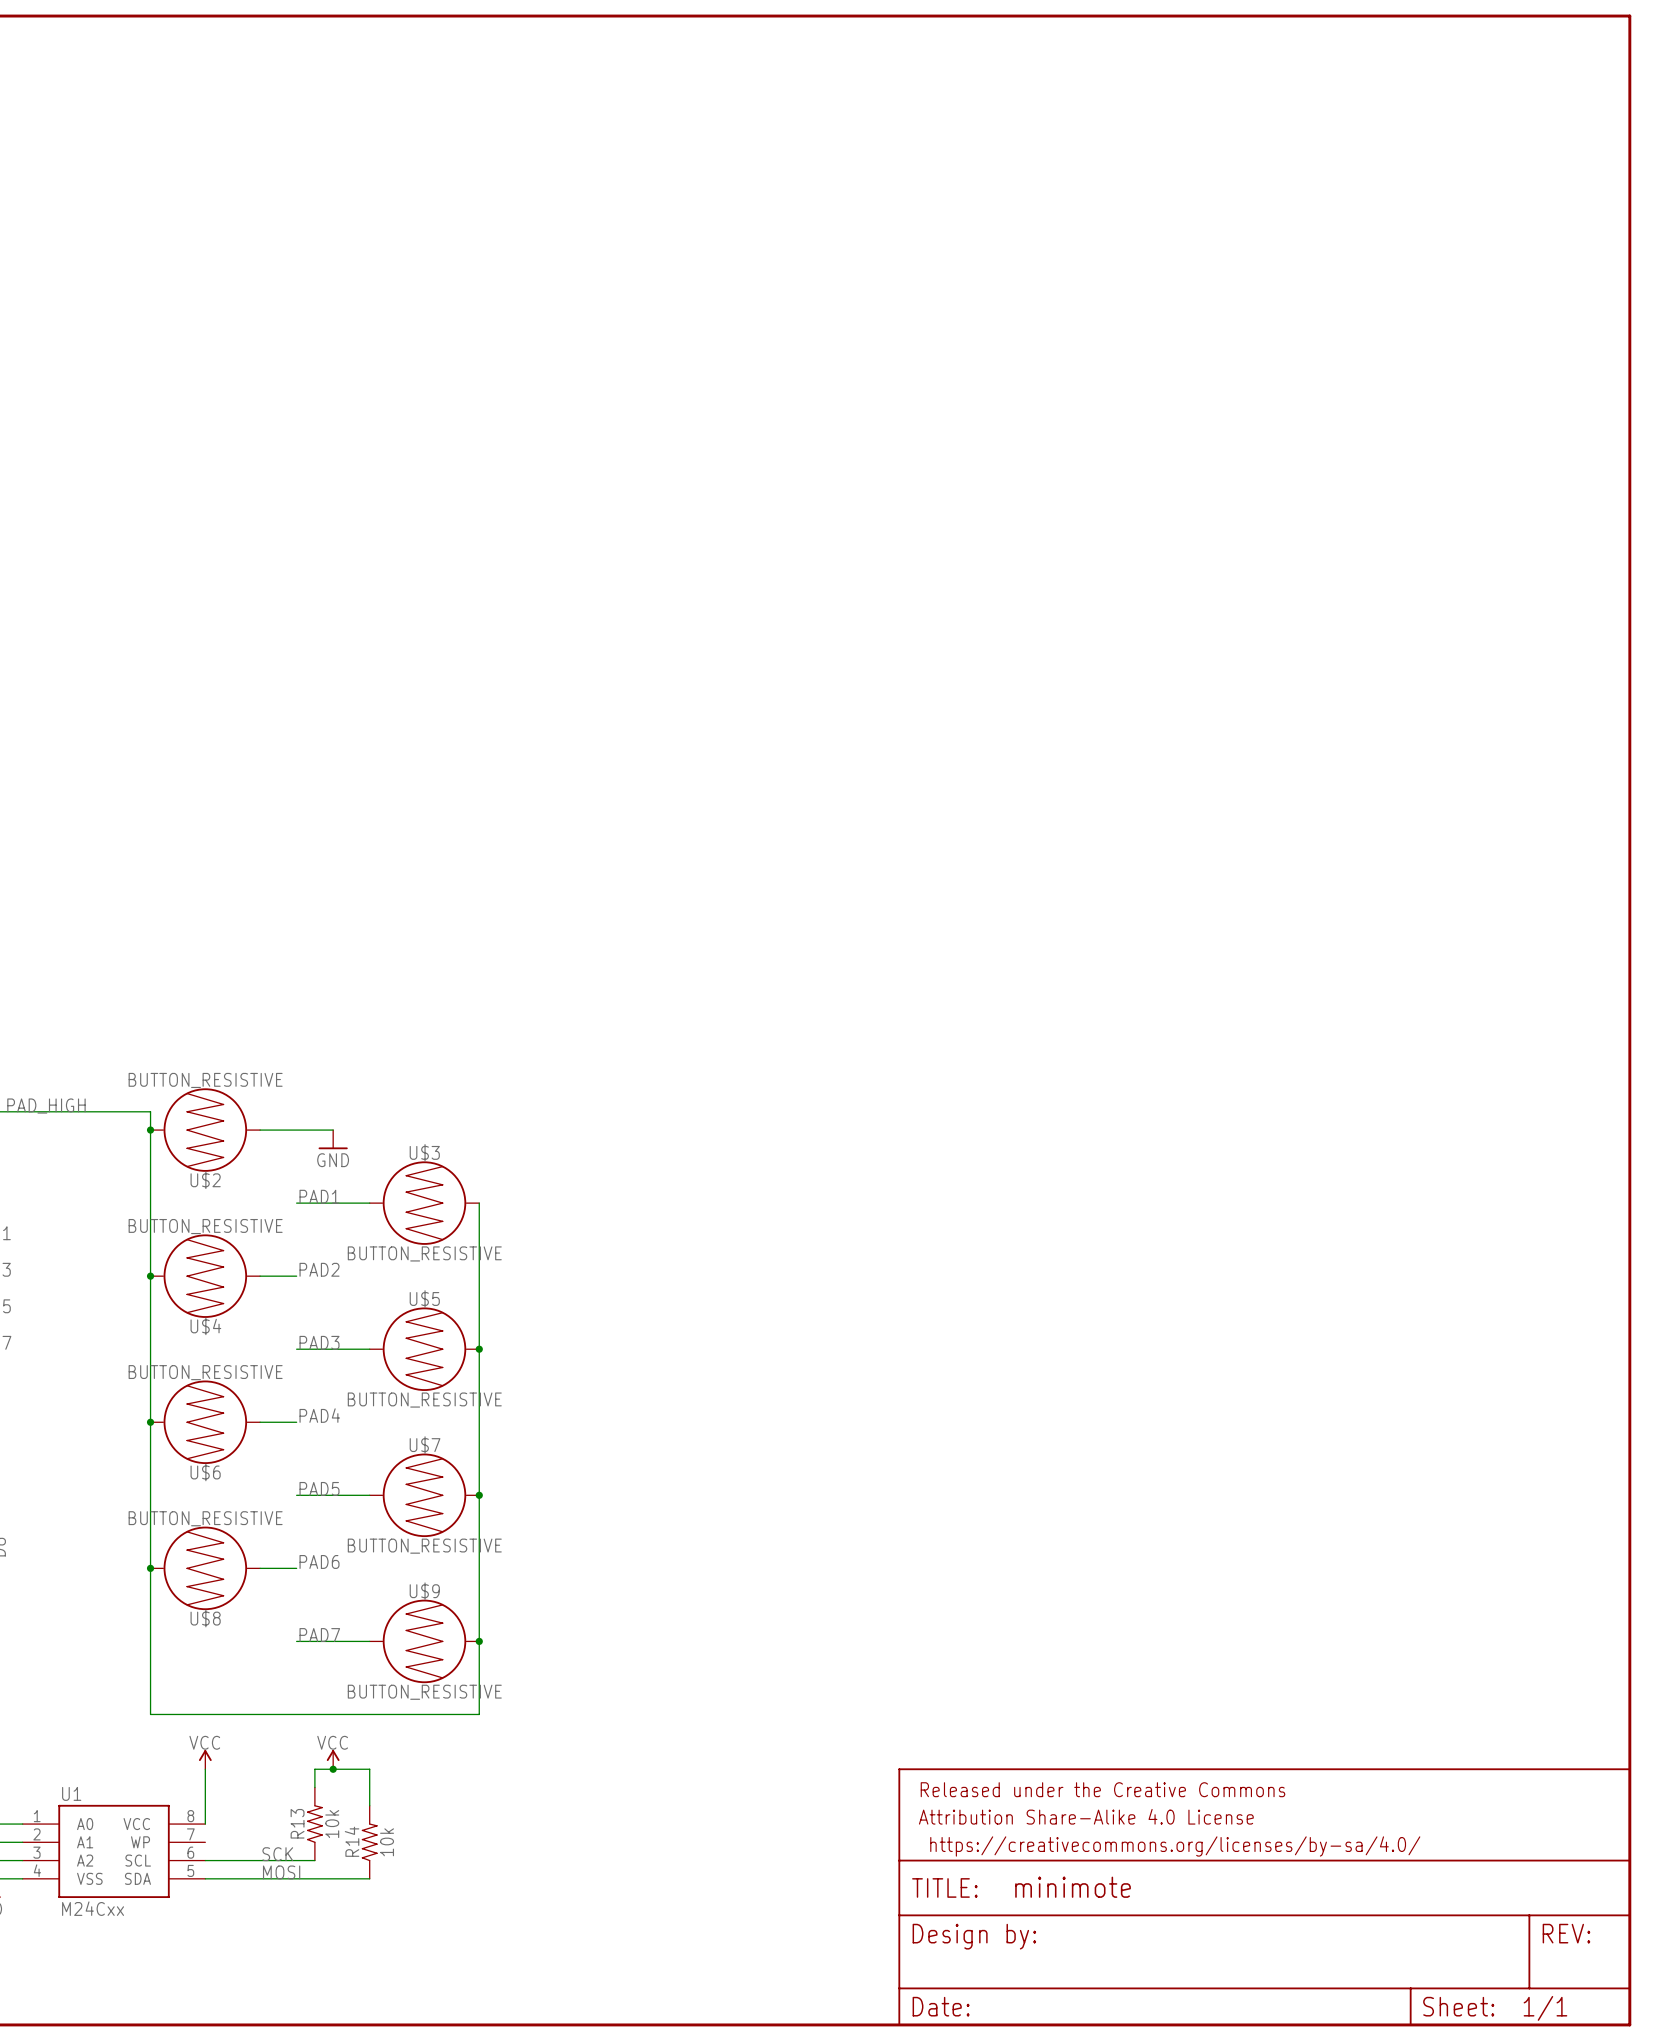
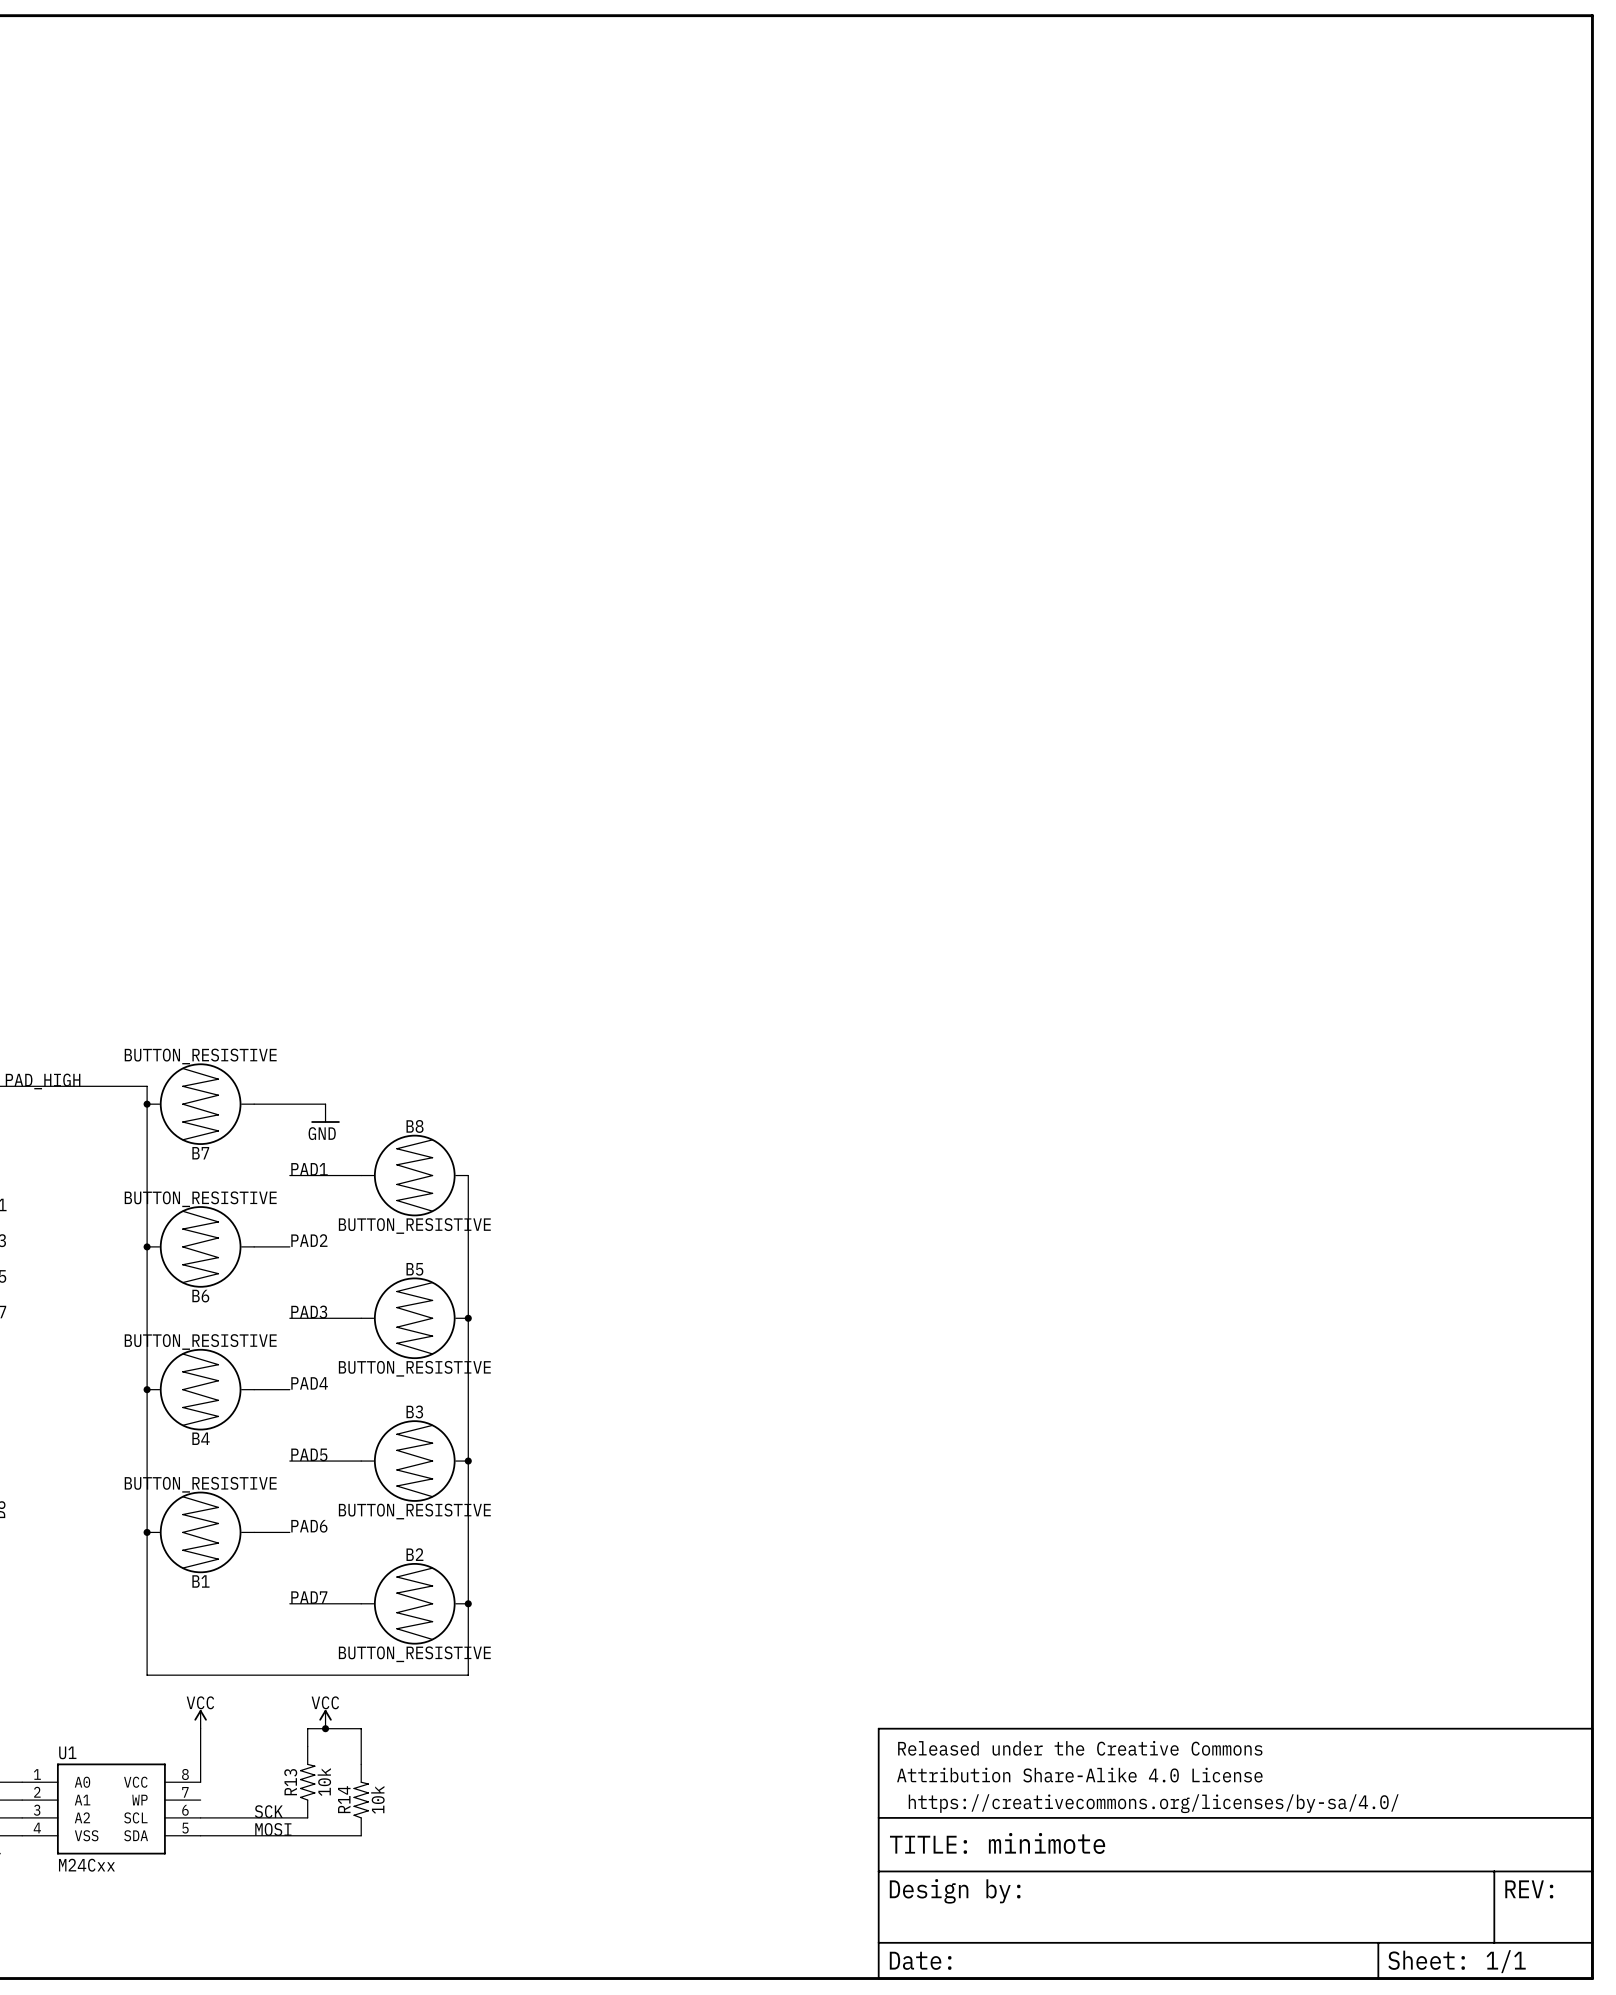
U$3 name: U$3 (424, 1152) -> B8 (415, 1126)
U$2 name: U$2 (205, 1180) -> B7 (200, 1153)
U$5 name: U$5 (424, 1298) -> B5 (414, 1269)
U$4 name: U$4 (205, 1326) -> B6 (200, 1296)
U$7 name: U$7 (425, 1445) -> B3 (414, 1411)
U$6 name: U$6 (205, 1472) -> B4 (201, 1438)
U$9 name: U$9 (424, 1591) -> B2 (414, 1554)
U$8 name: U$8 (205, 1618) -> B1 (200, 1581)

